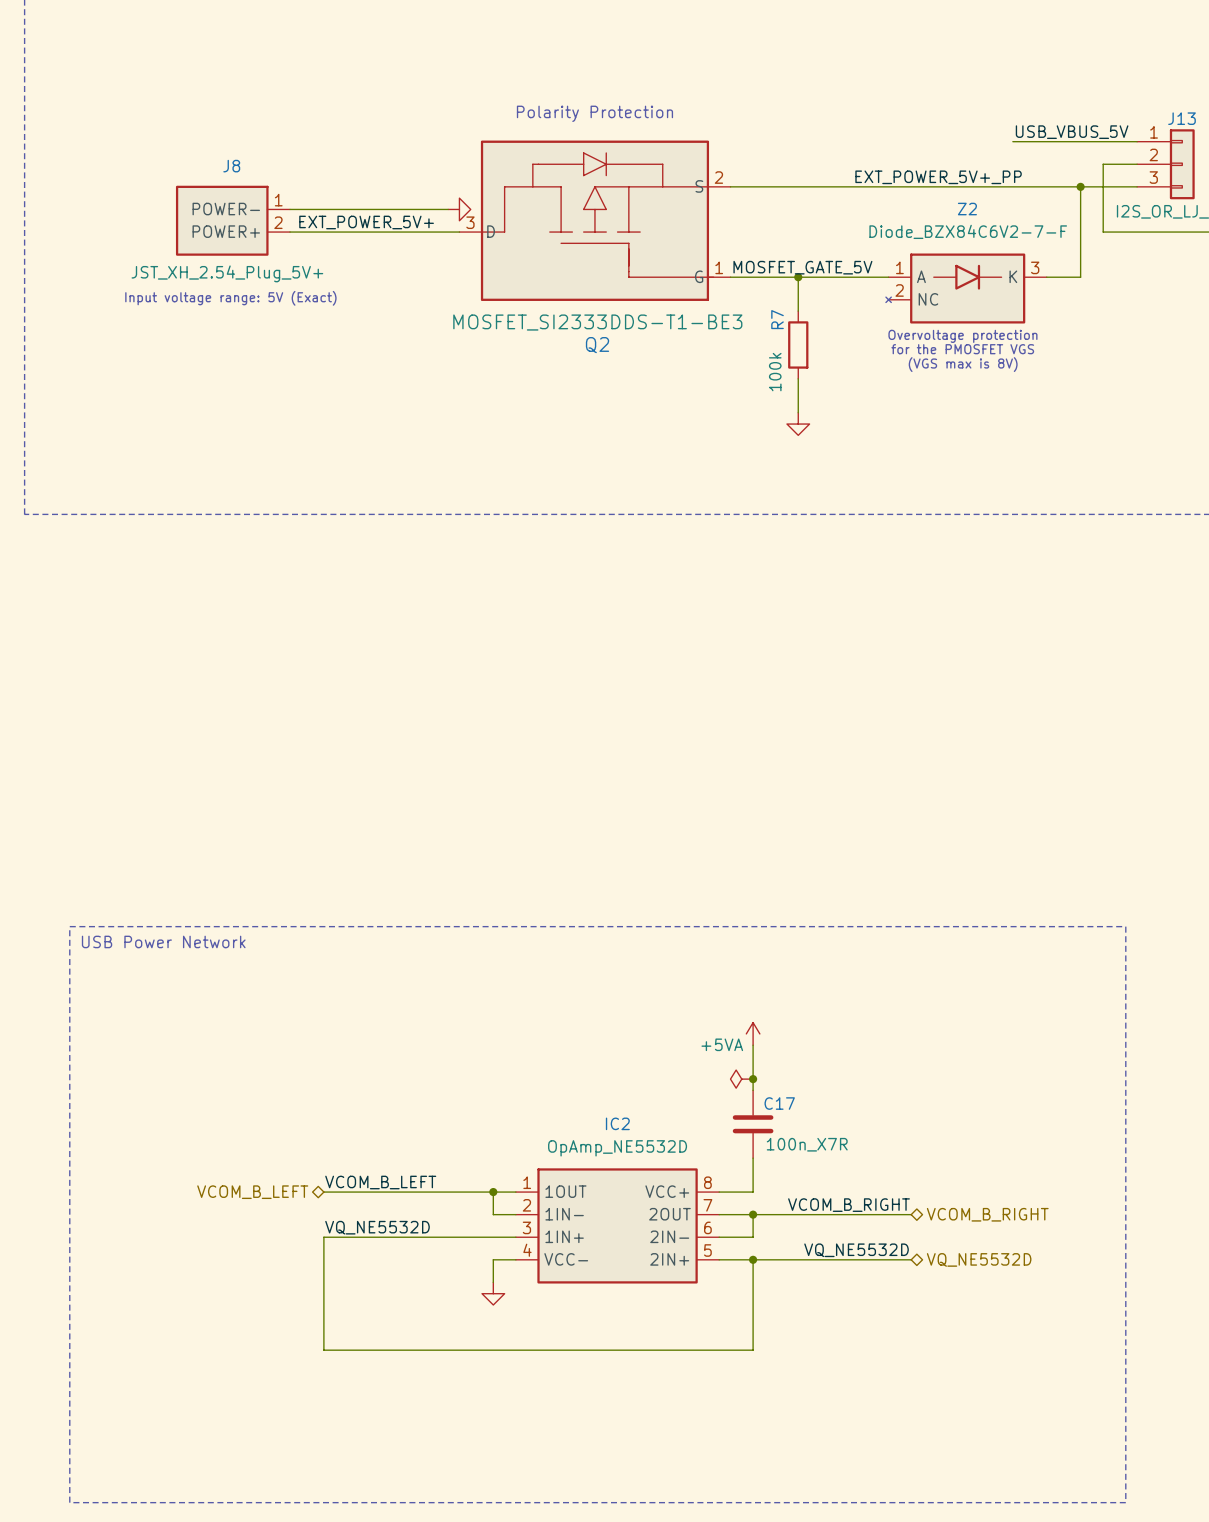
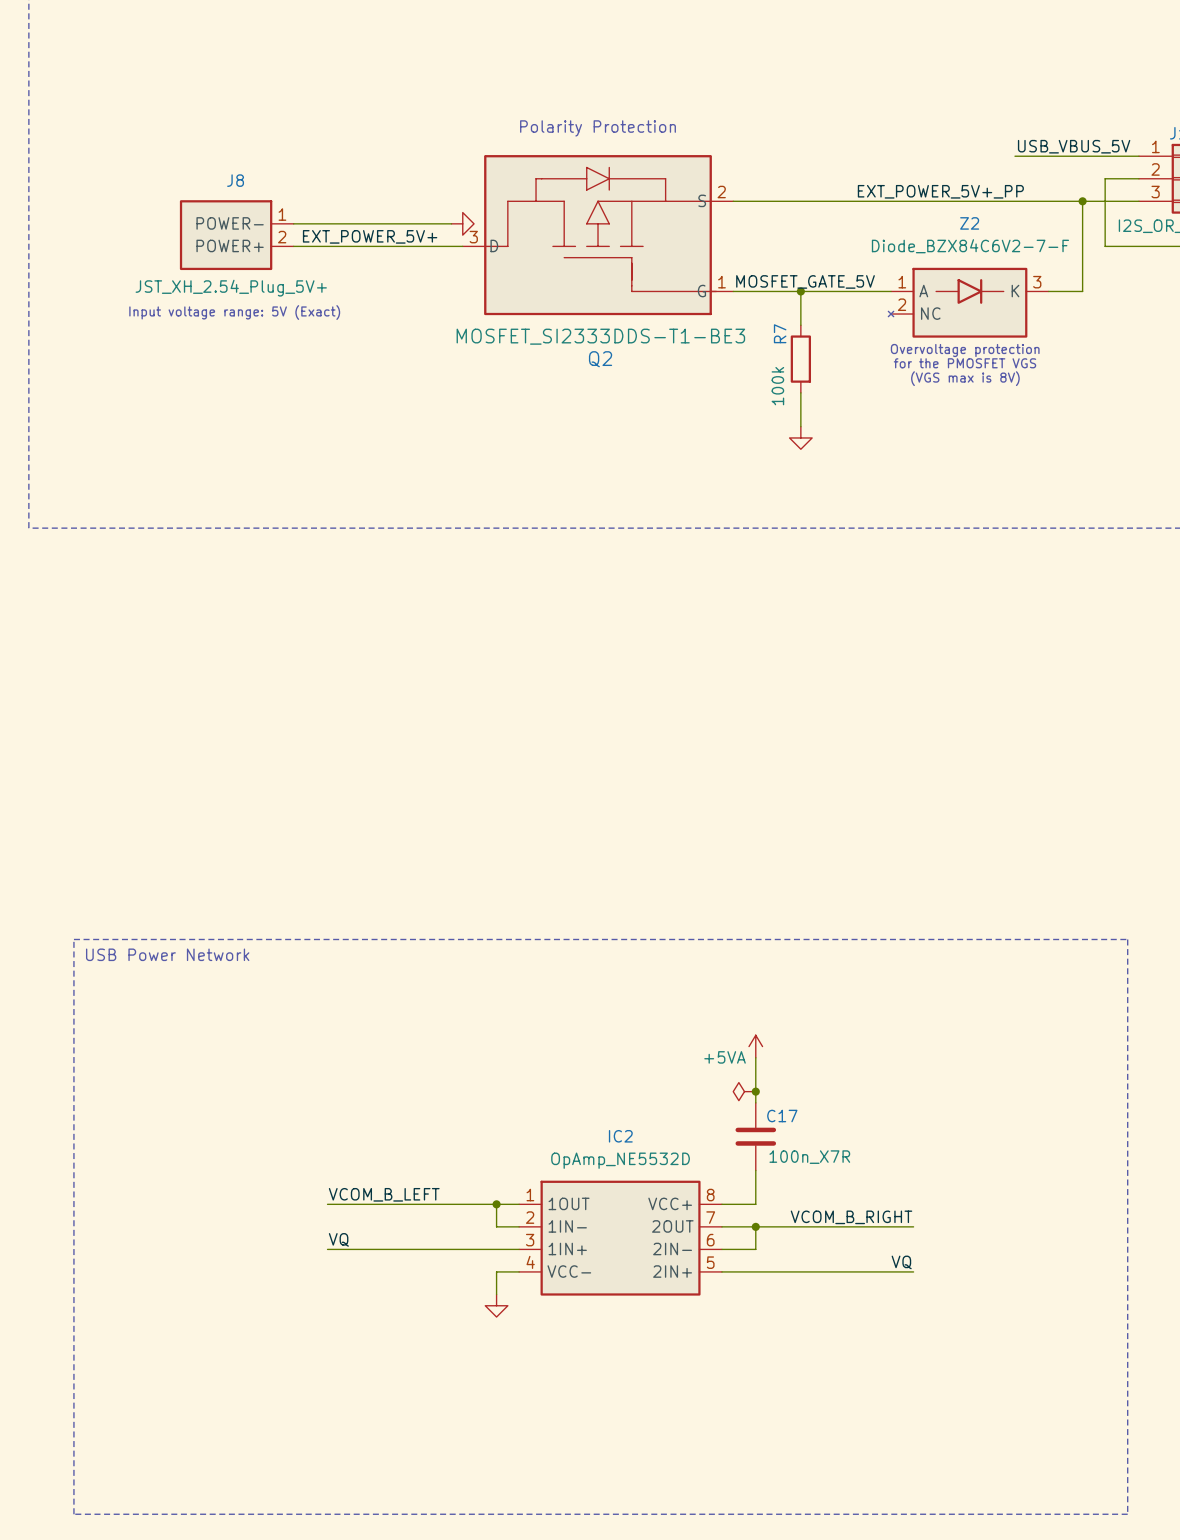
hierarchical label: VCOM_B_LEFT (252, 1192) -> none
hierarchical label: VCOM_B_RIGHT (987, 1214) -> none
label: VQ_NE5532D (377, 1227) -> VQ (338, 1239)
wire: (323, 1237) (323, 1350) (753, 1350) (753, 1259) -> none
label: VQ_NE5532D (856, 1250) -> VQ (901, 1262)
junction: (753, 1259) -> none
hierarchical label: VQ_NE5532D (979, 1259) -> none

